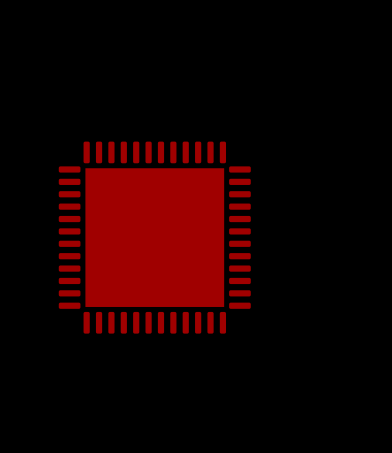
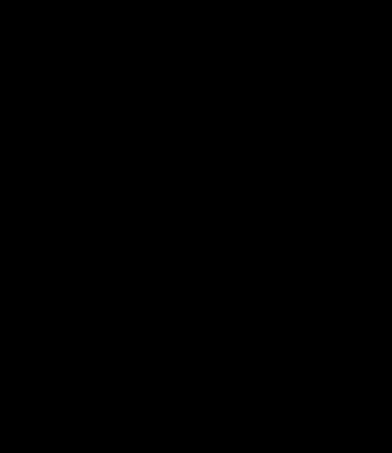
part: (154, 237) -> none

